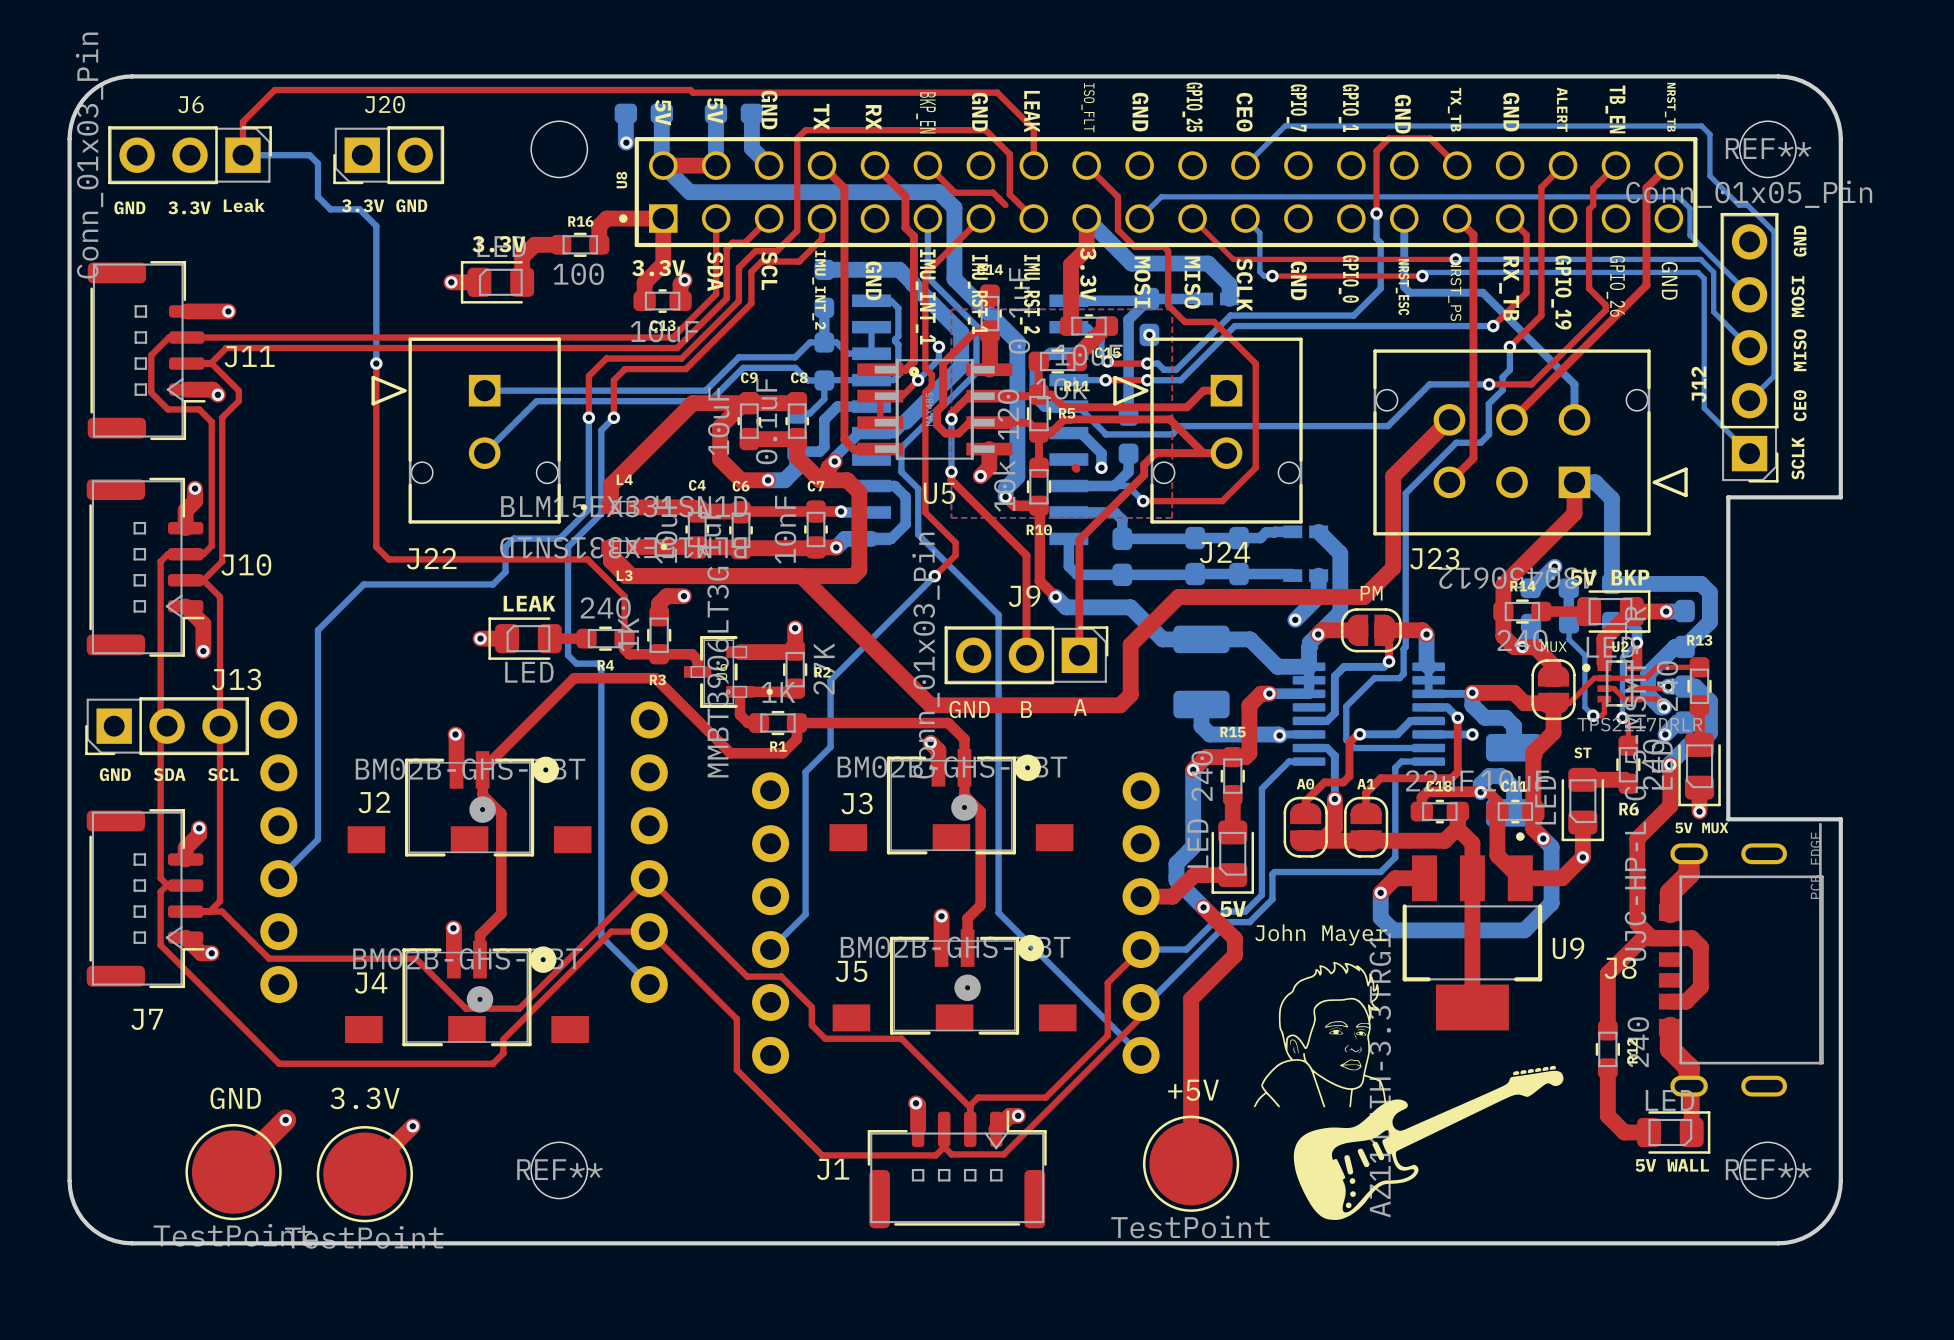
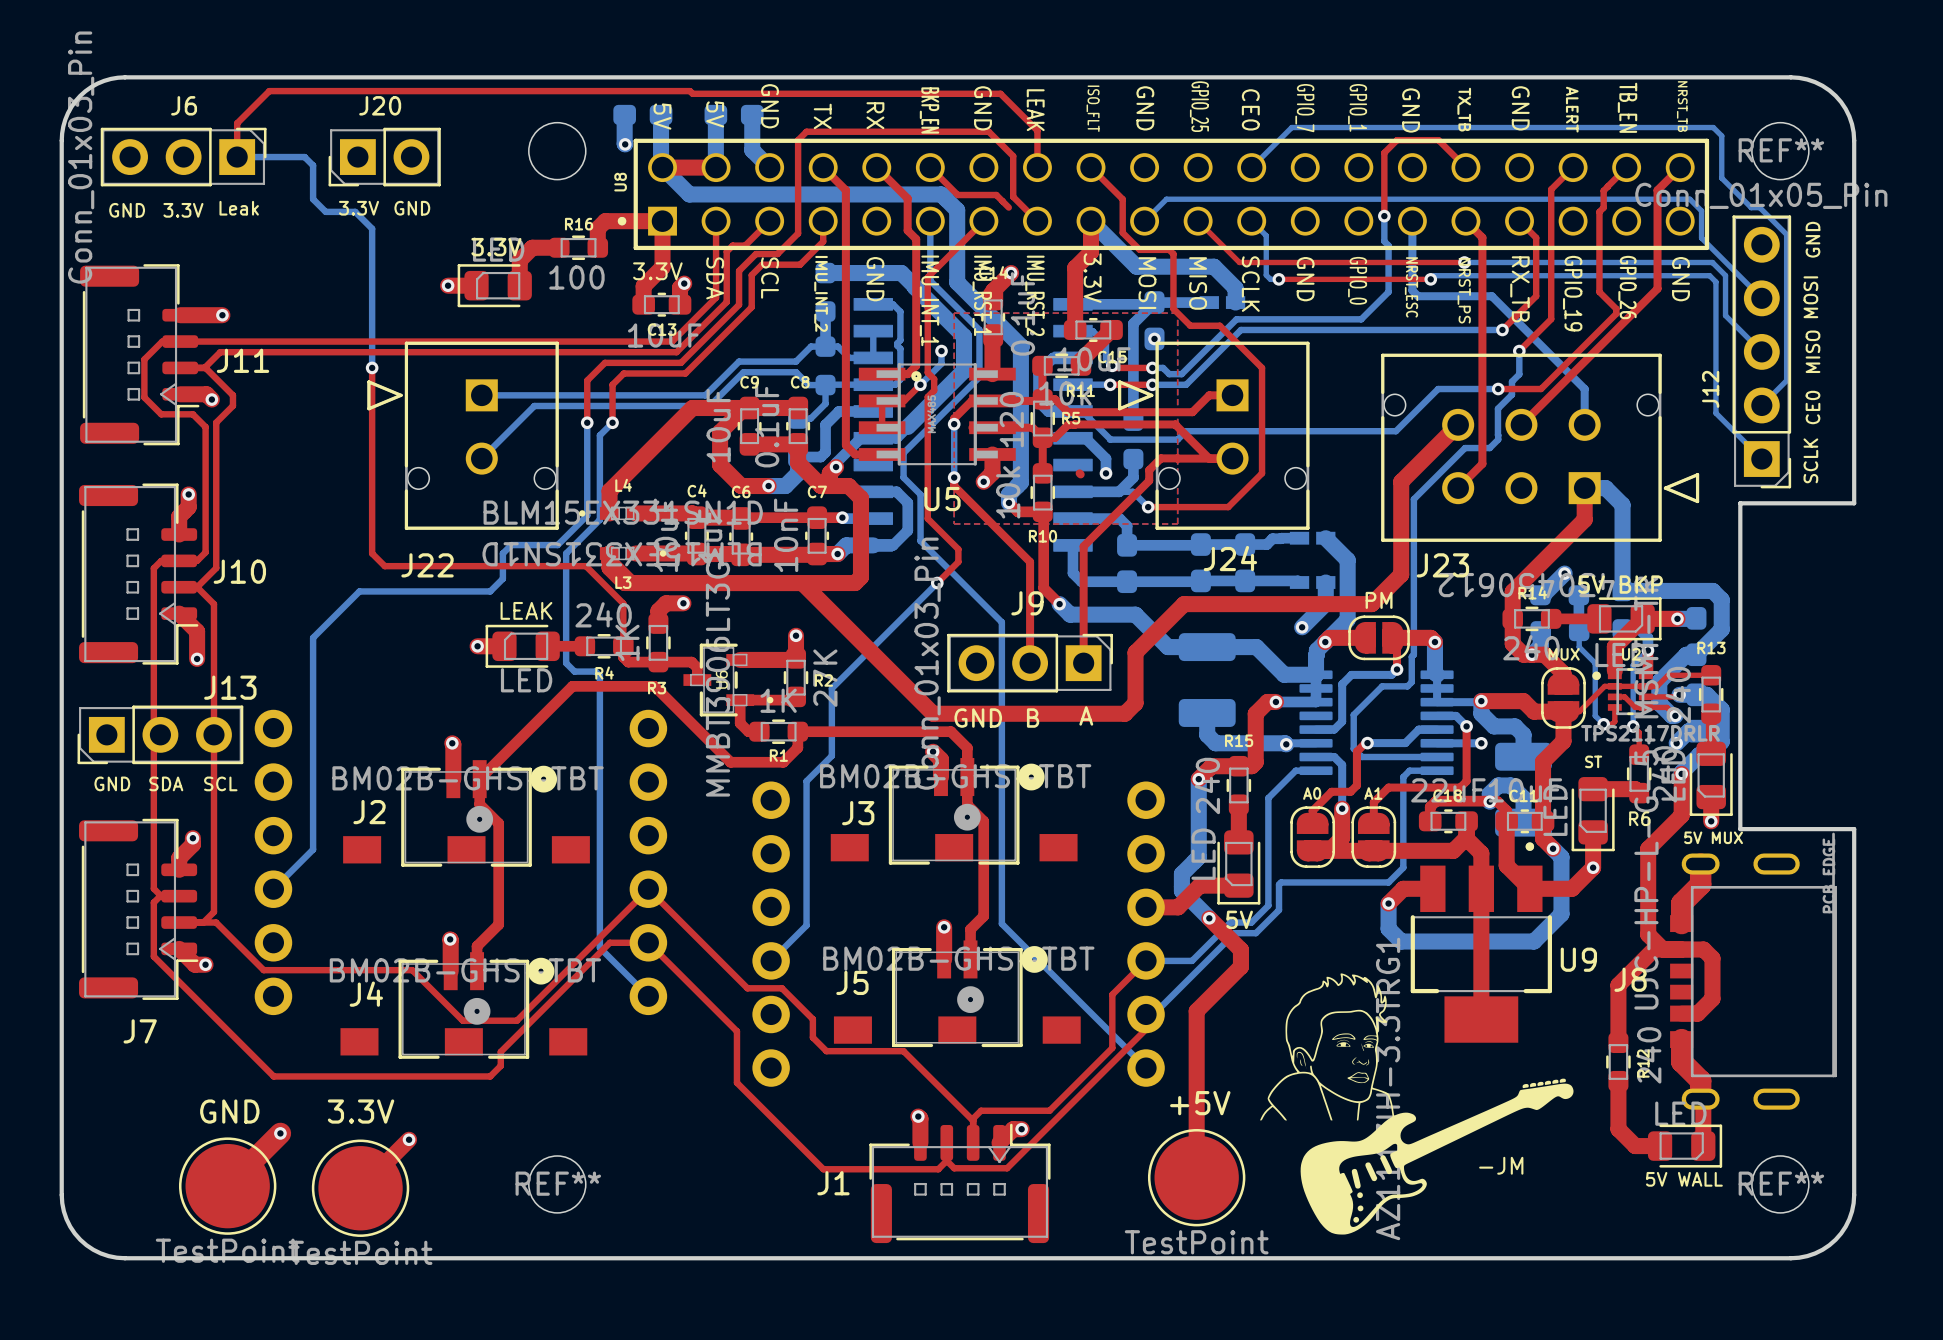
top track: none -> (1011, 273) (993, 290) (993, 299)
via: none -> (1011, 273)
top track: (989, 369) (990, 331) (975, 331) (943, 363) (943, 404) (937, 410) (937, 425) (945, 433) (958, 433) (969, 422) -> (992, 374) (993, 335)
text: John Mayer (1321, 934) -> none
text: none -> -JM (1501, 1165)

